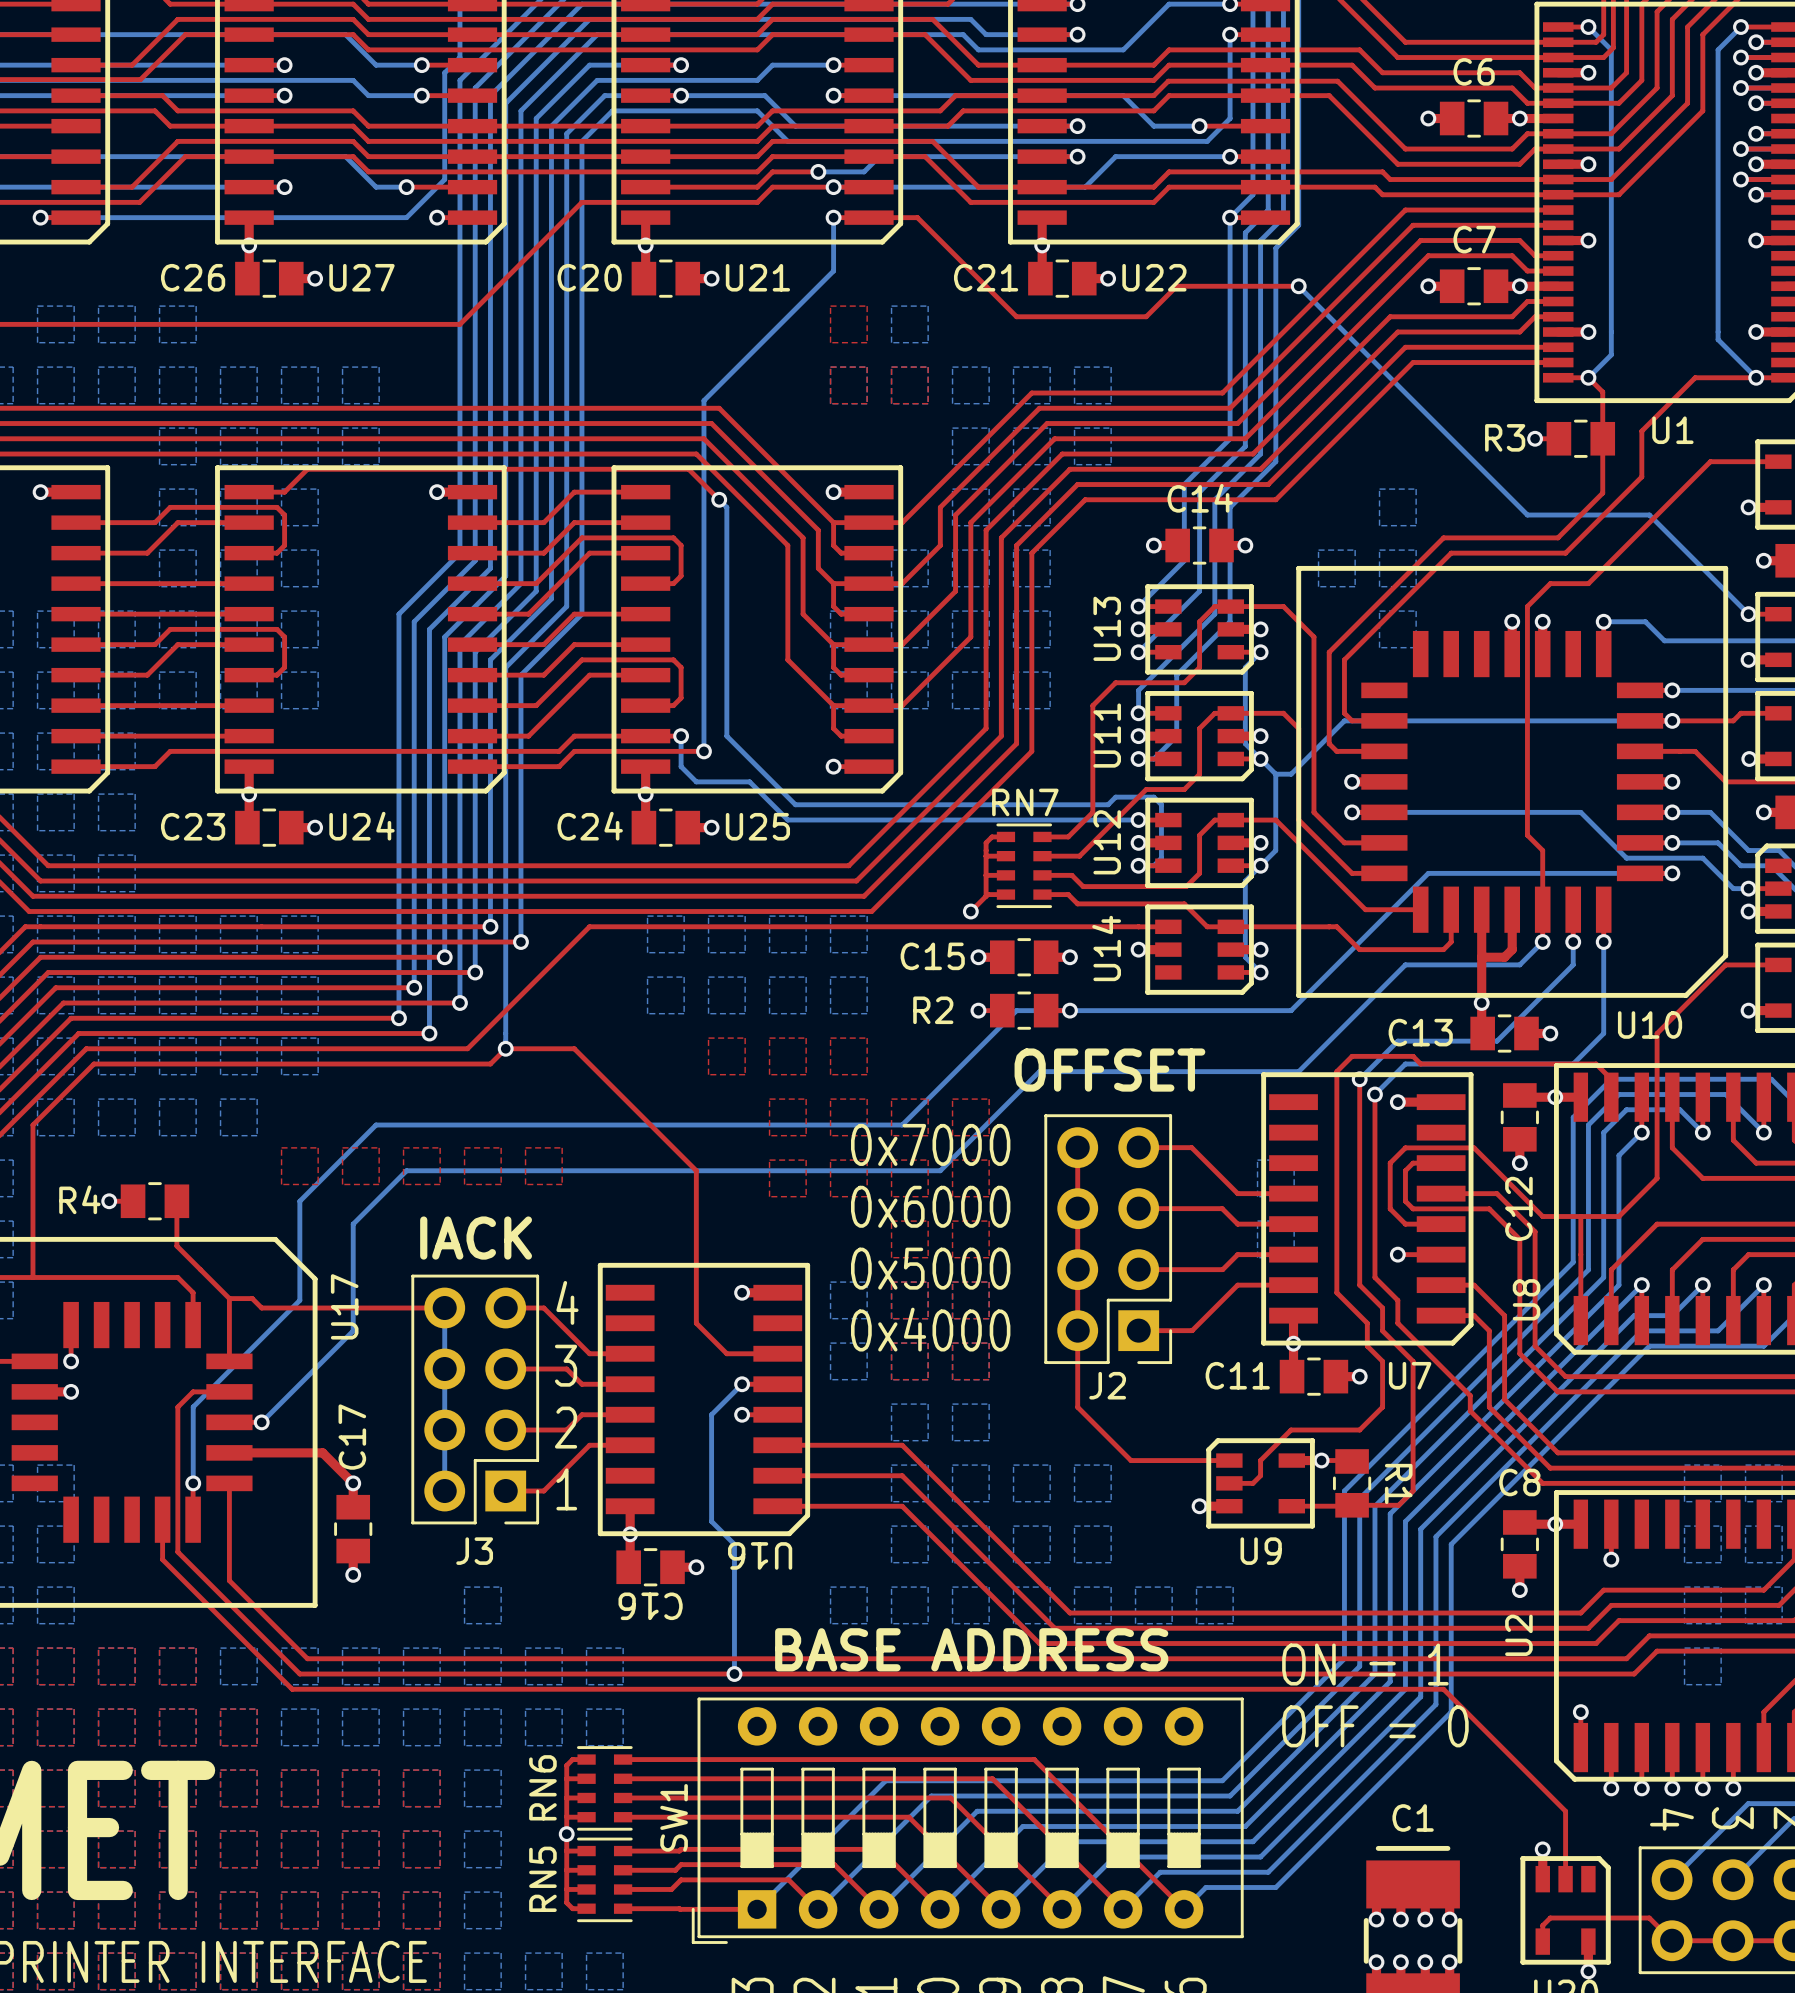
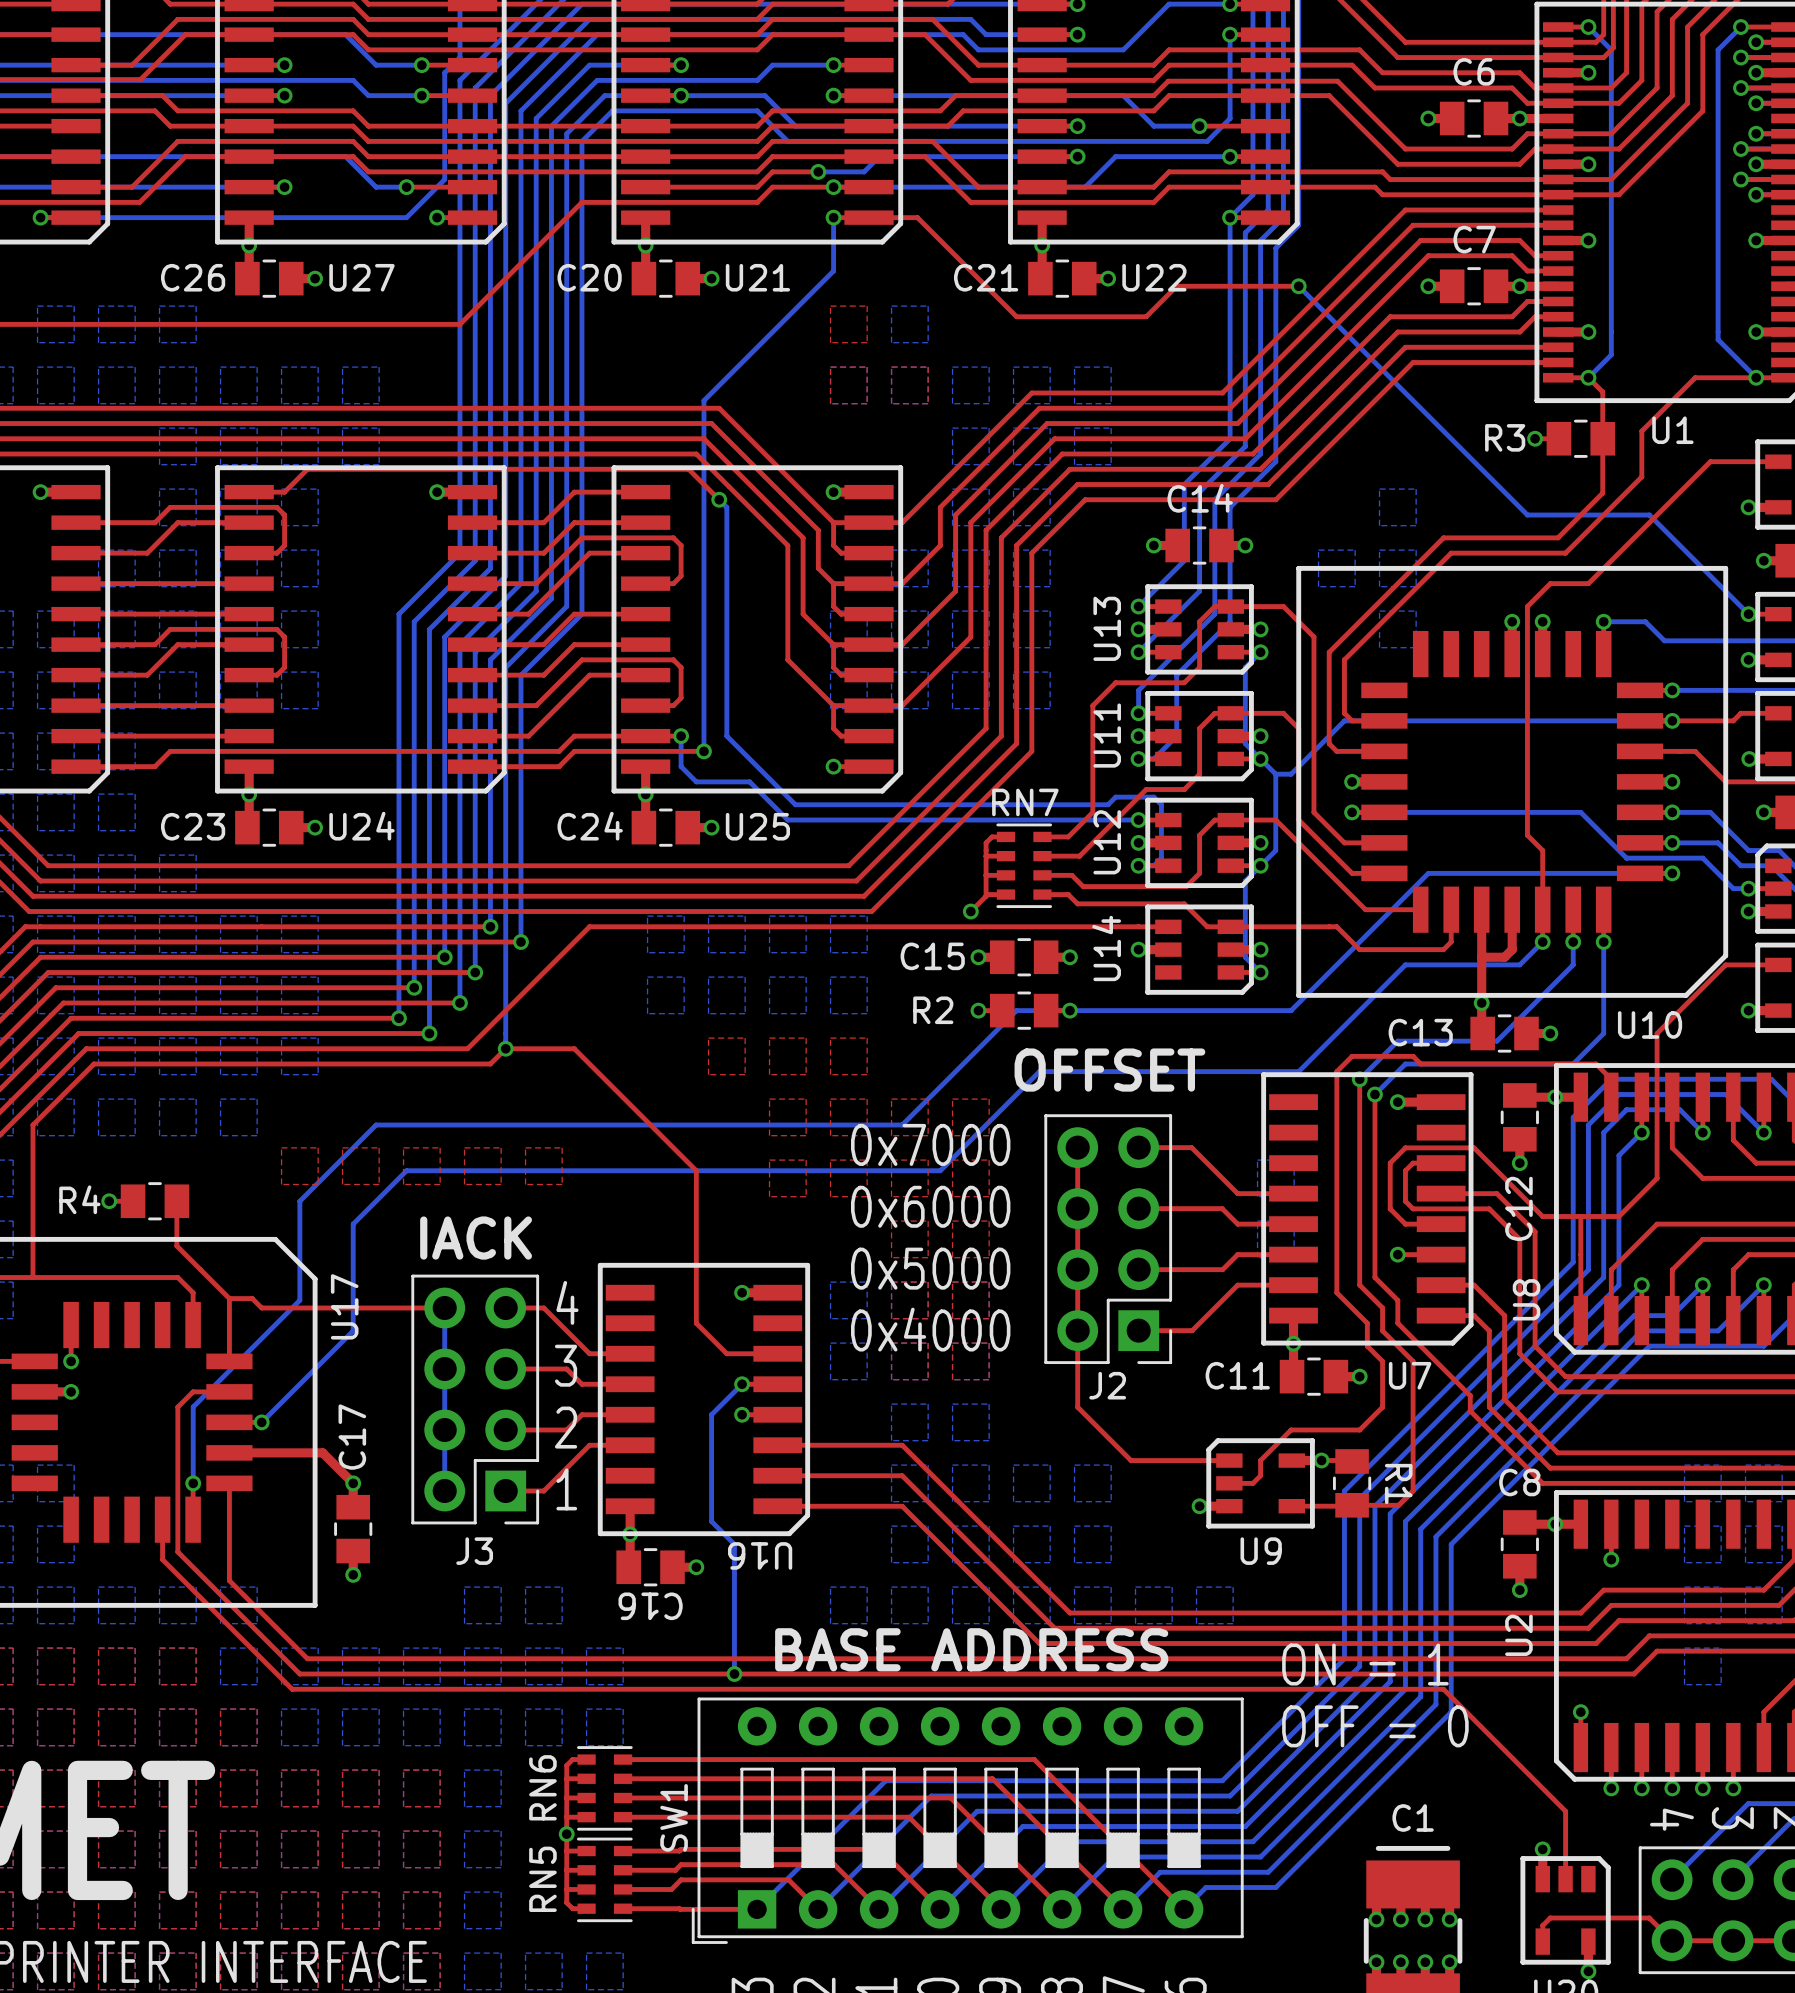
bottom zone outline: none -> (98, 550) (135, 550) (135, 586) (98, 586) (98, 550)
bottom zone outline: none -> (159, 855) (196, 855) (196, 891) (159, 891) (159, 855)
bottom zone outline: none -> (98, 1587) (135, 1587) (135, 1623) (98, 1623) (98, 1587)
bottom zone outline: none -> (159, 1587) (159, 1623) (196, 1623) (196, 1587) (159, 1587)
bottom zone outline: none -> (220, 1587) (220, 1623) (257, 1623) (257, 1587) (220, 1587)
bottom zone outline: none -> (525, 1587) (562, 1587) (562, 1623) (525, 1623) (525, 1587)

